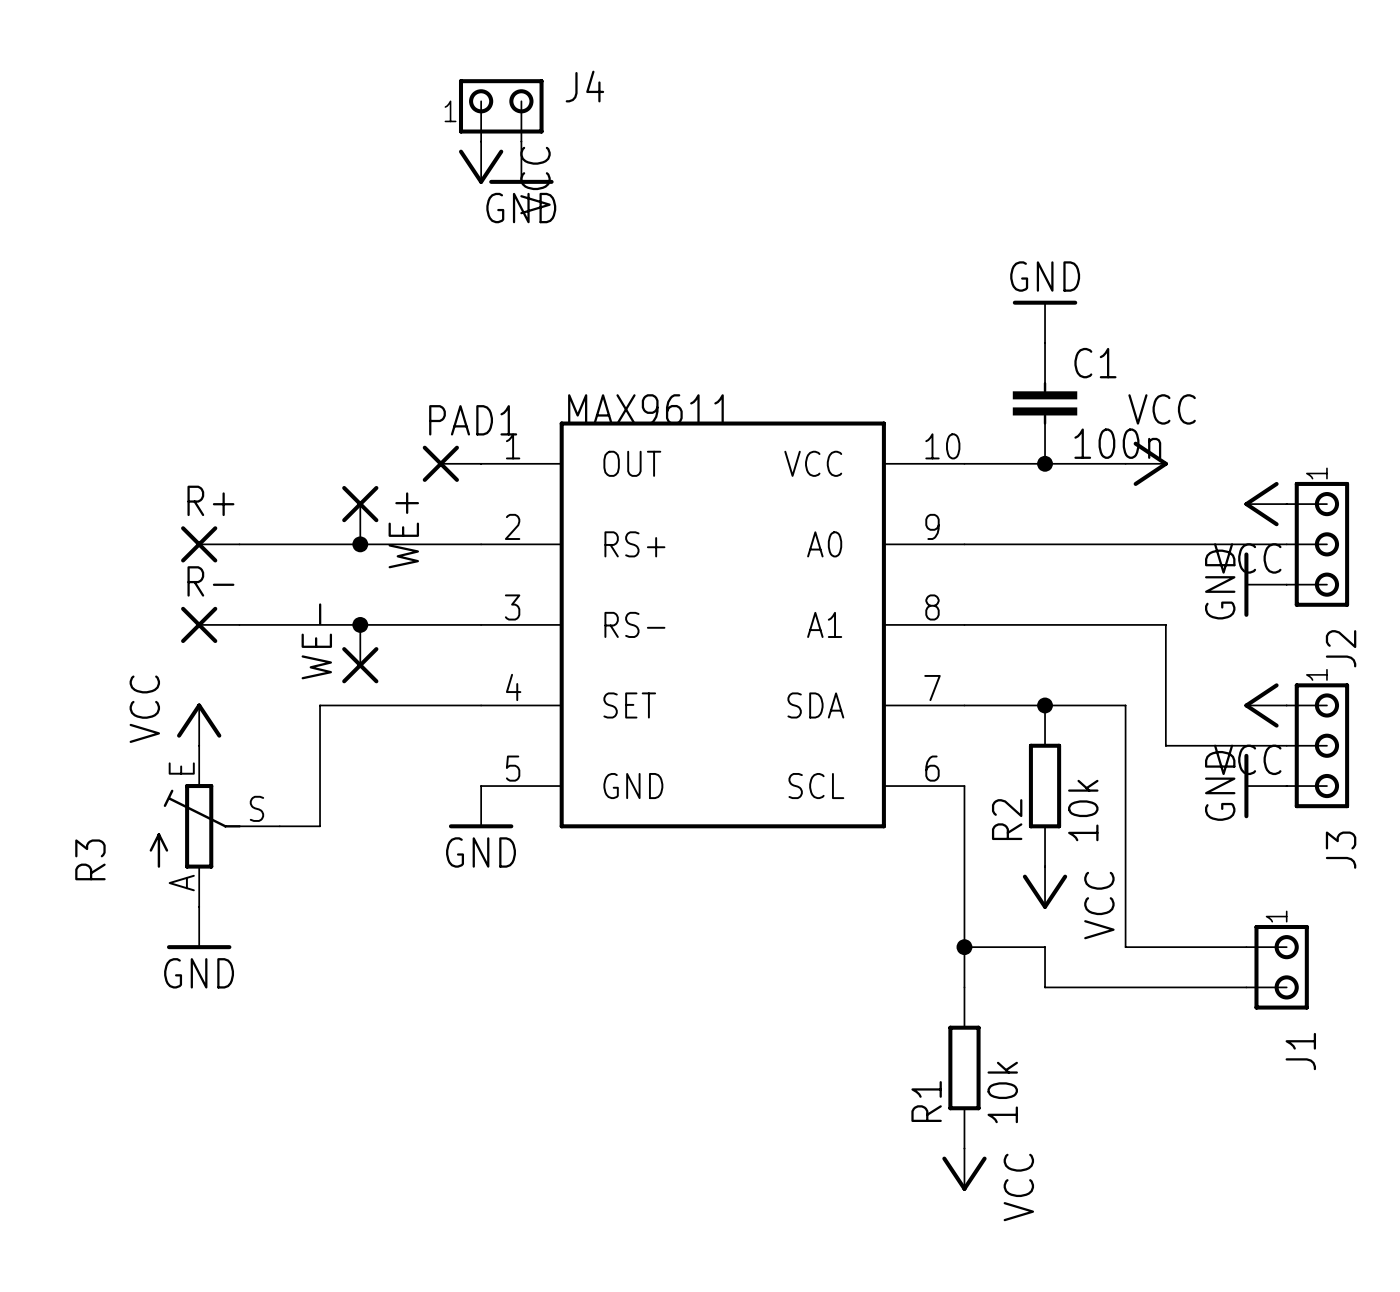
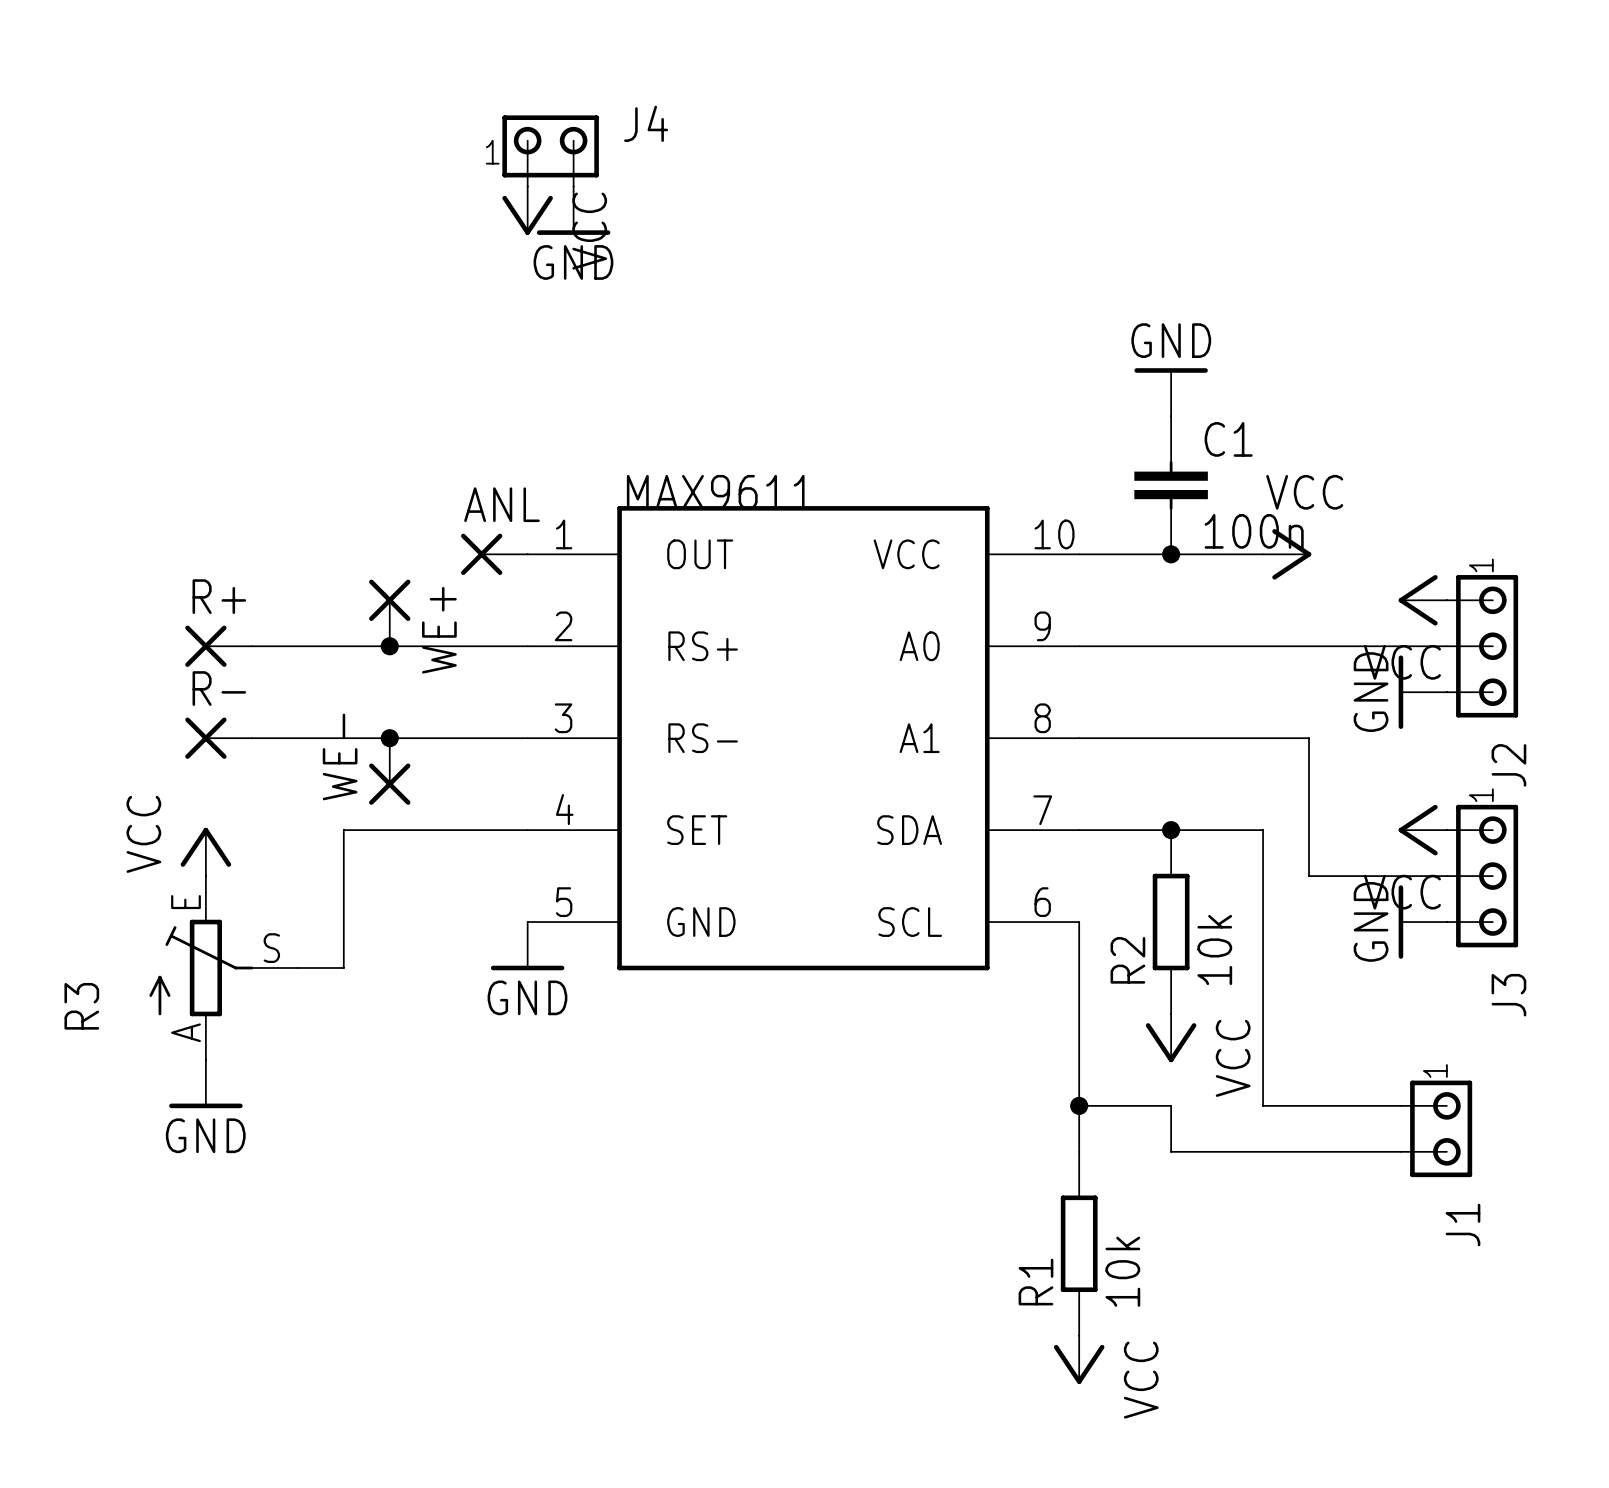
PAD1 name: PAD1 (473, 420) -> ANL (501, 504)

